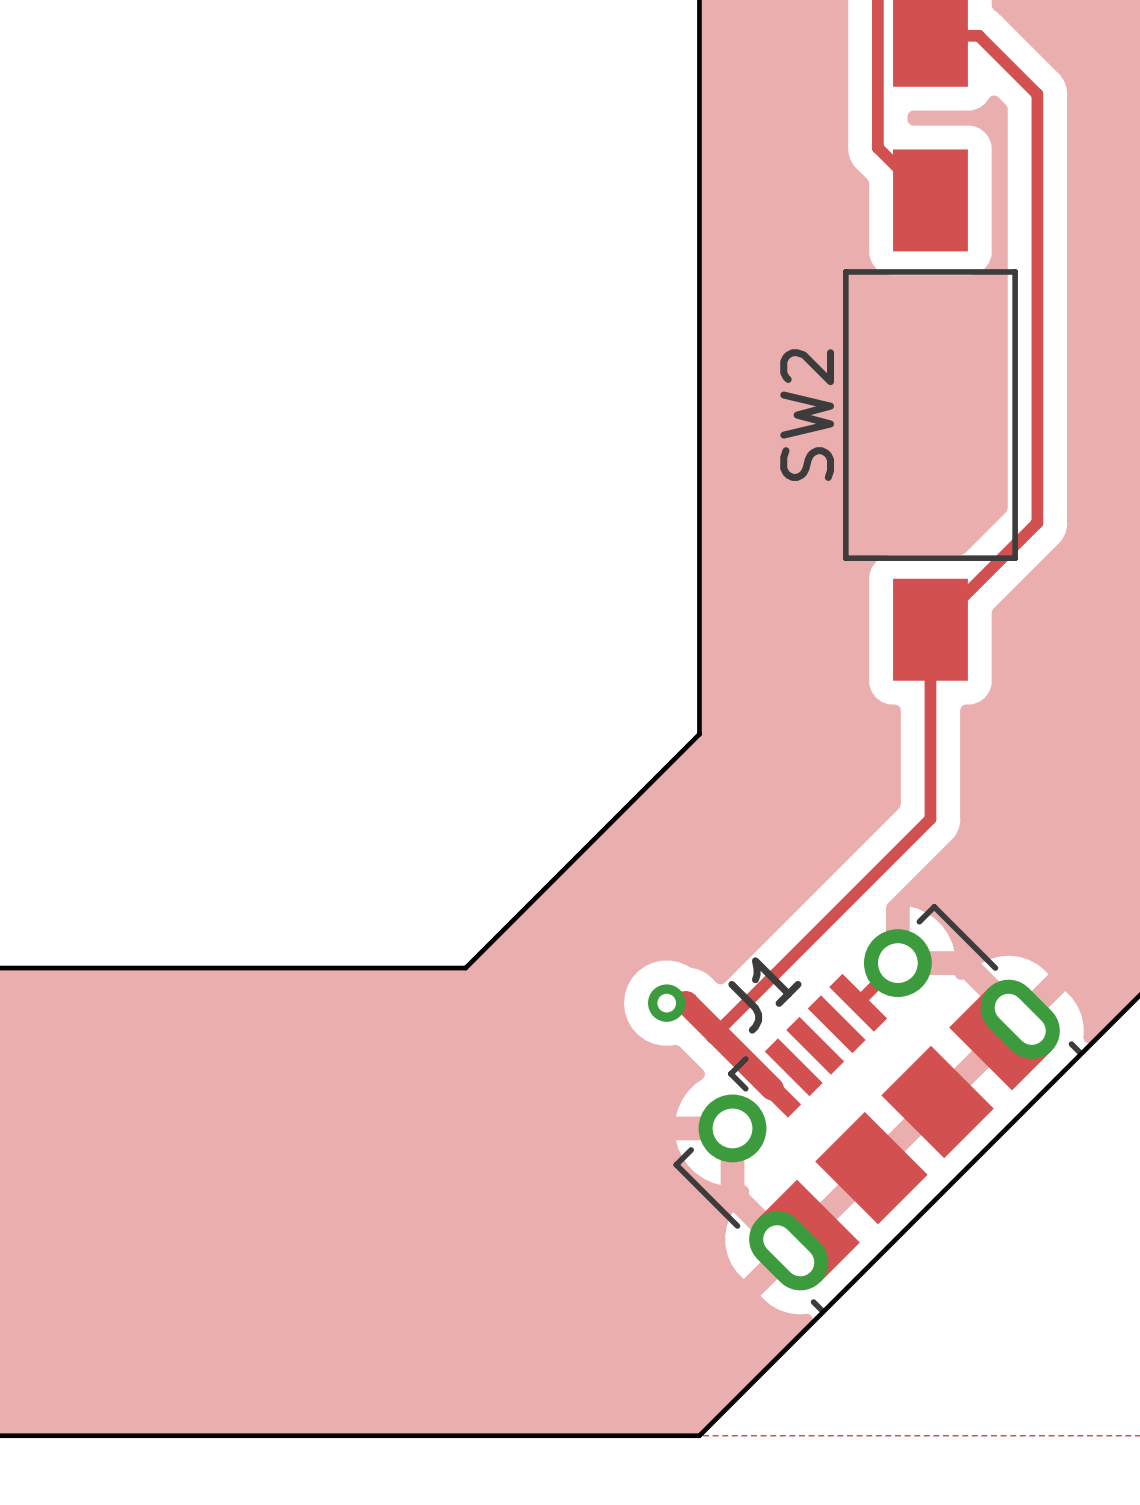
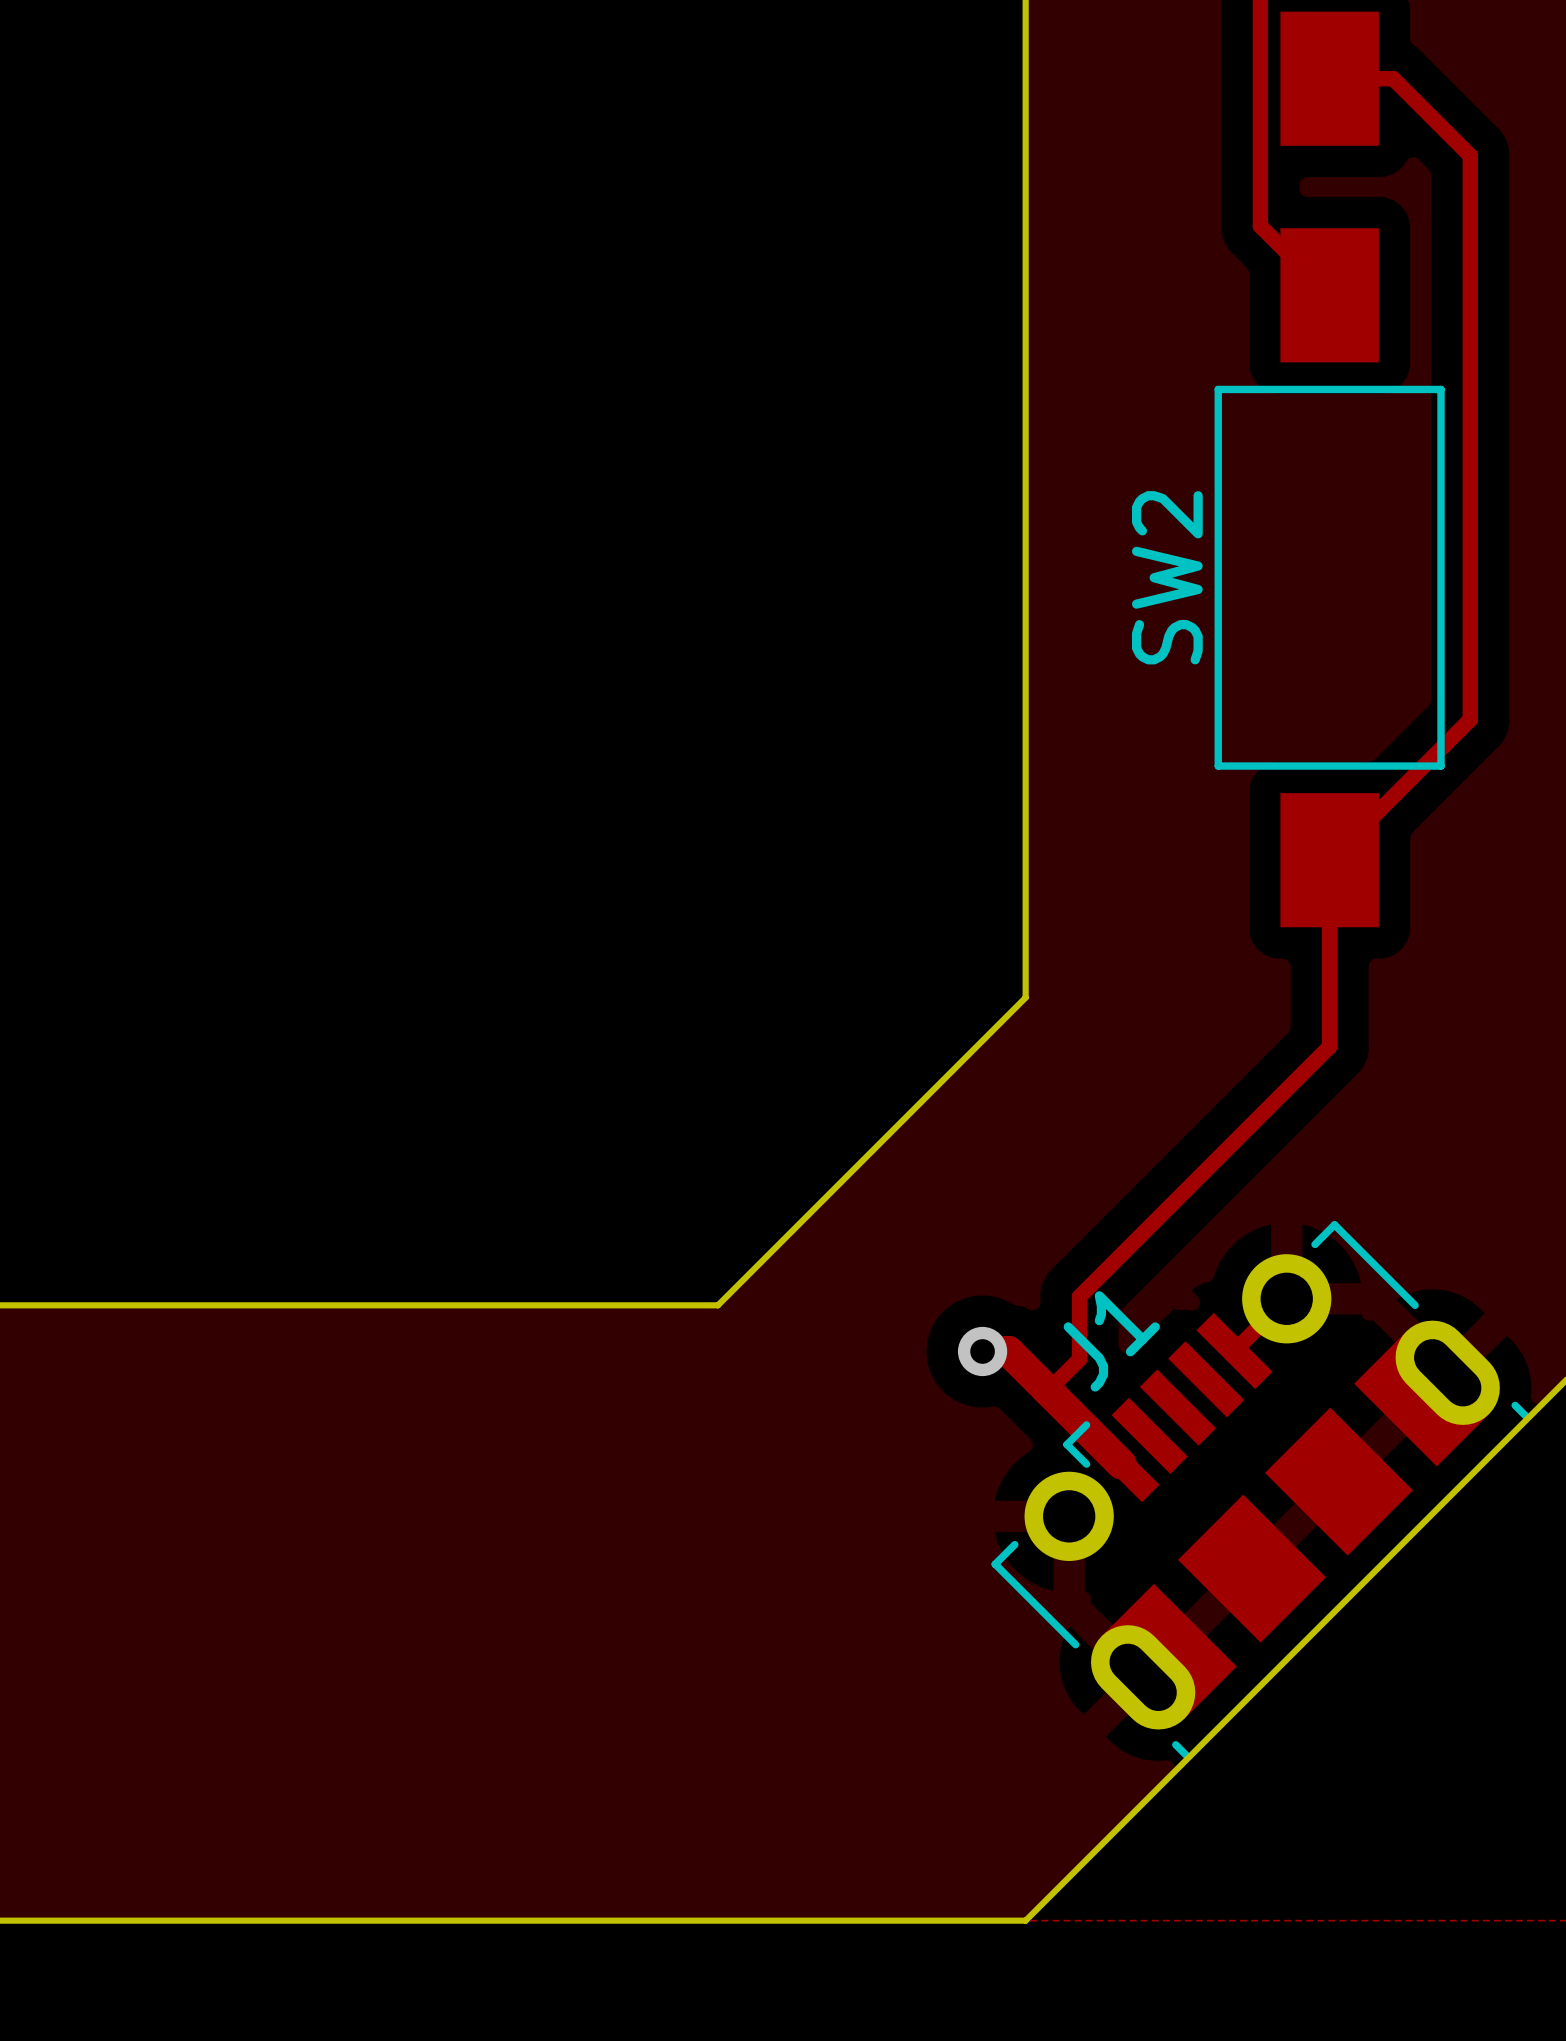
track: (930, 771) (930, 818) (740, 1009) -> (1329, 1046) (1079, 1296) (1079, 1359)

